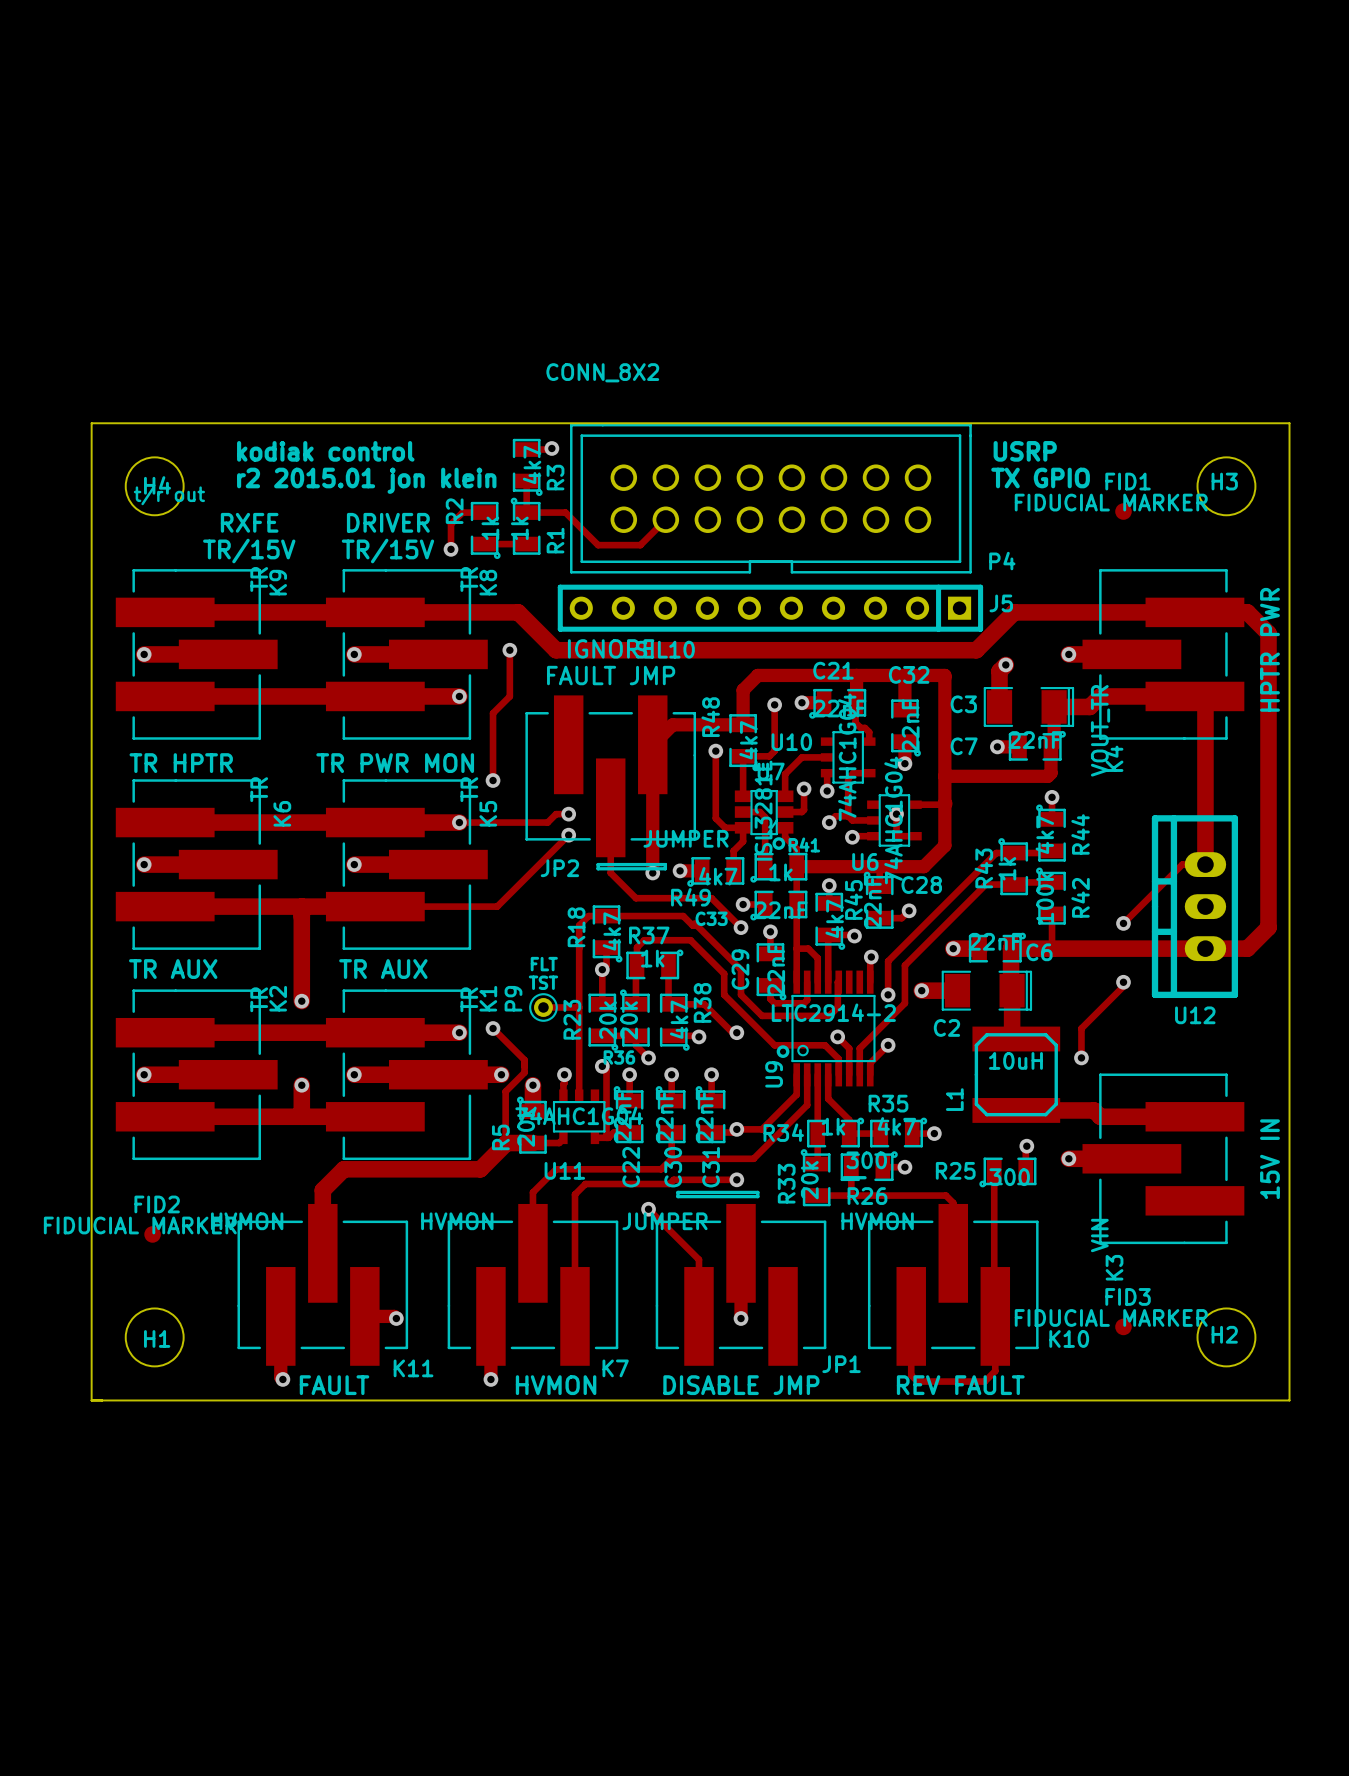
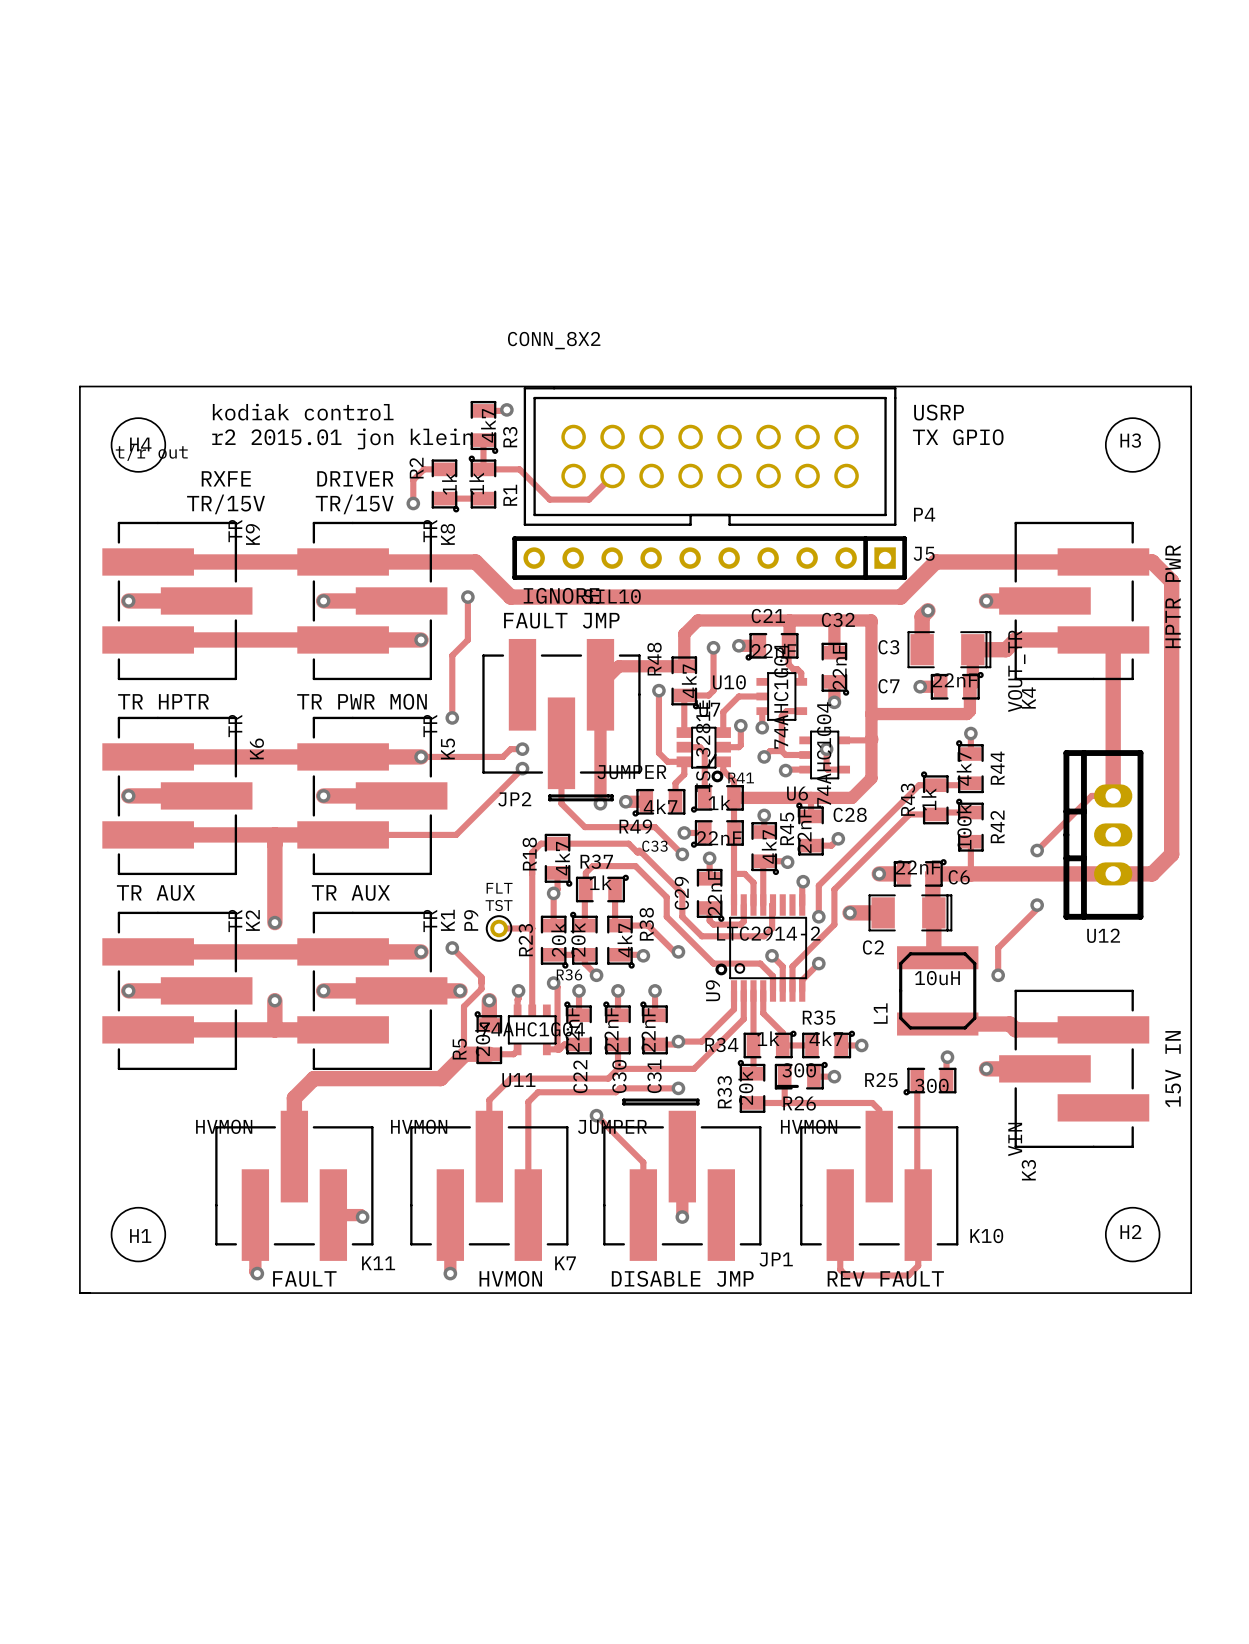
FID1: FIDUCIAL MARKER (1123, 511) -> none
FID2: FIDUCIAL MARKER (152, 1234) -> none
FID3: FIDUCIAL MARKER (1123, 1326) -> none

